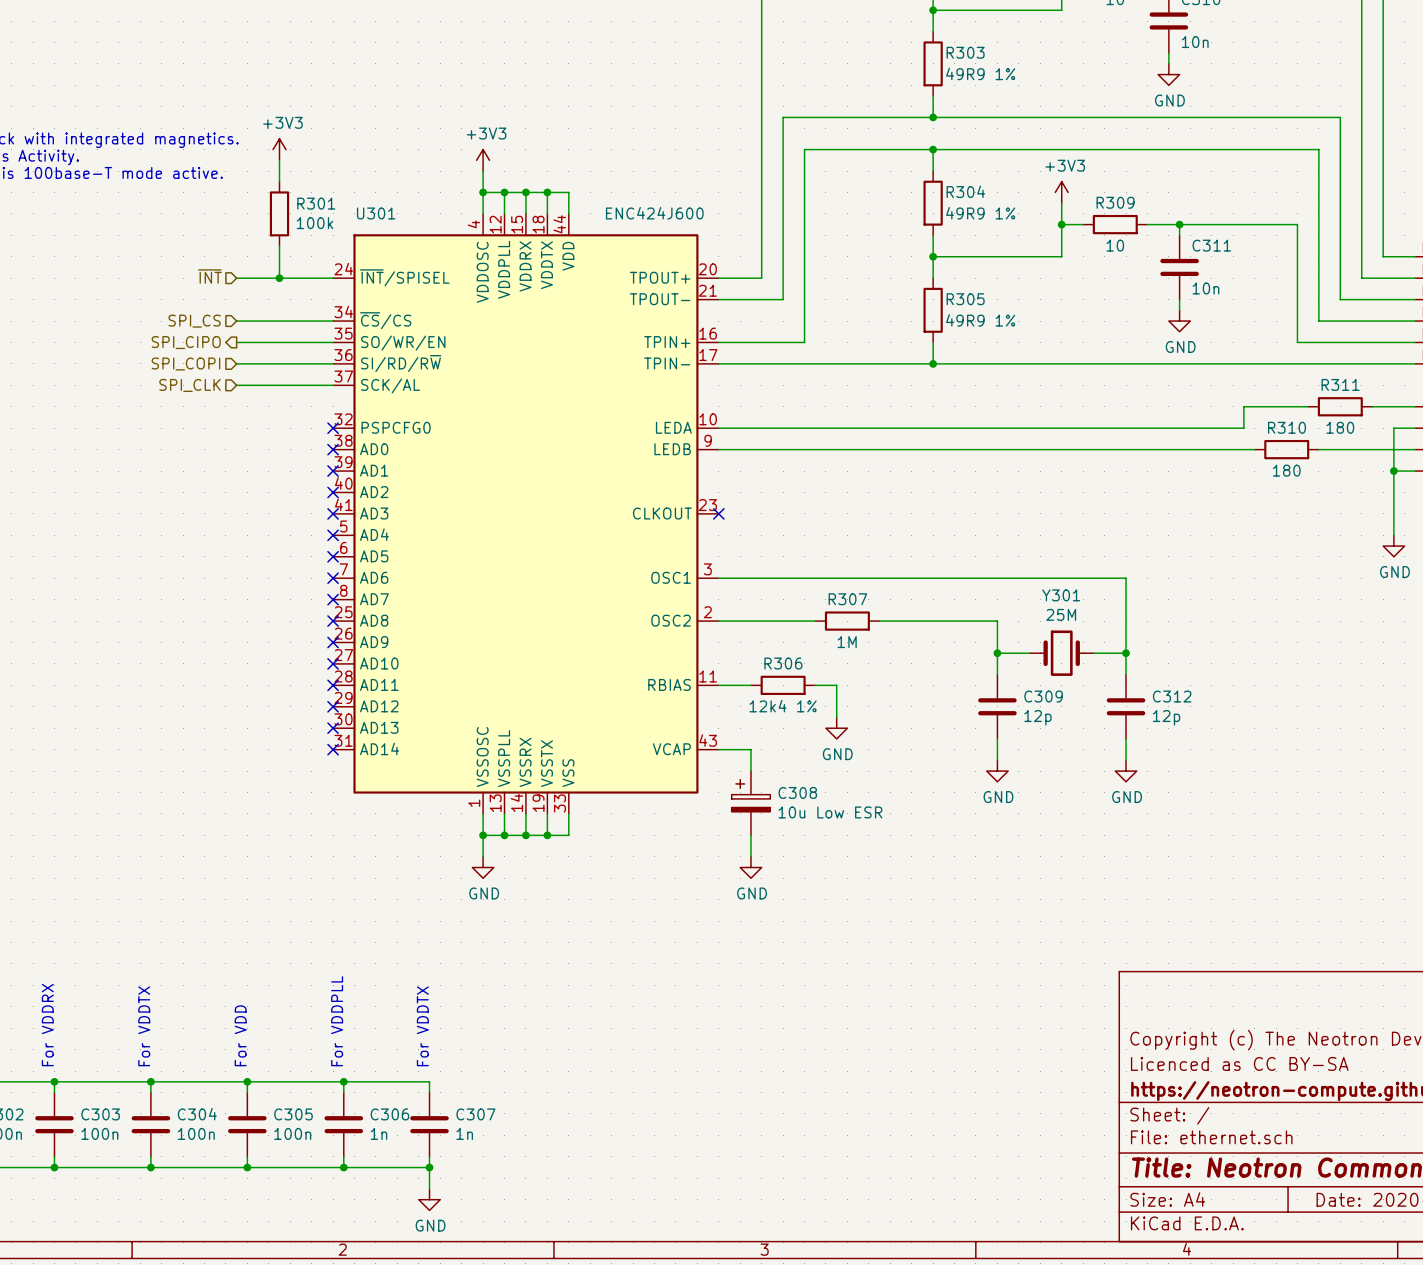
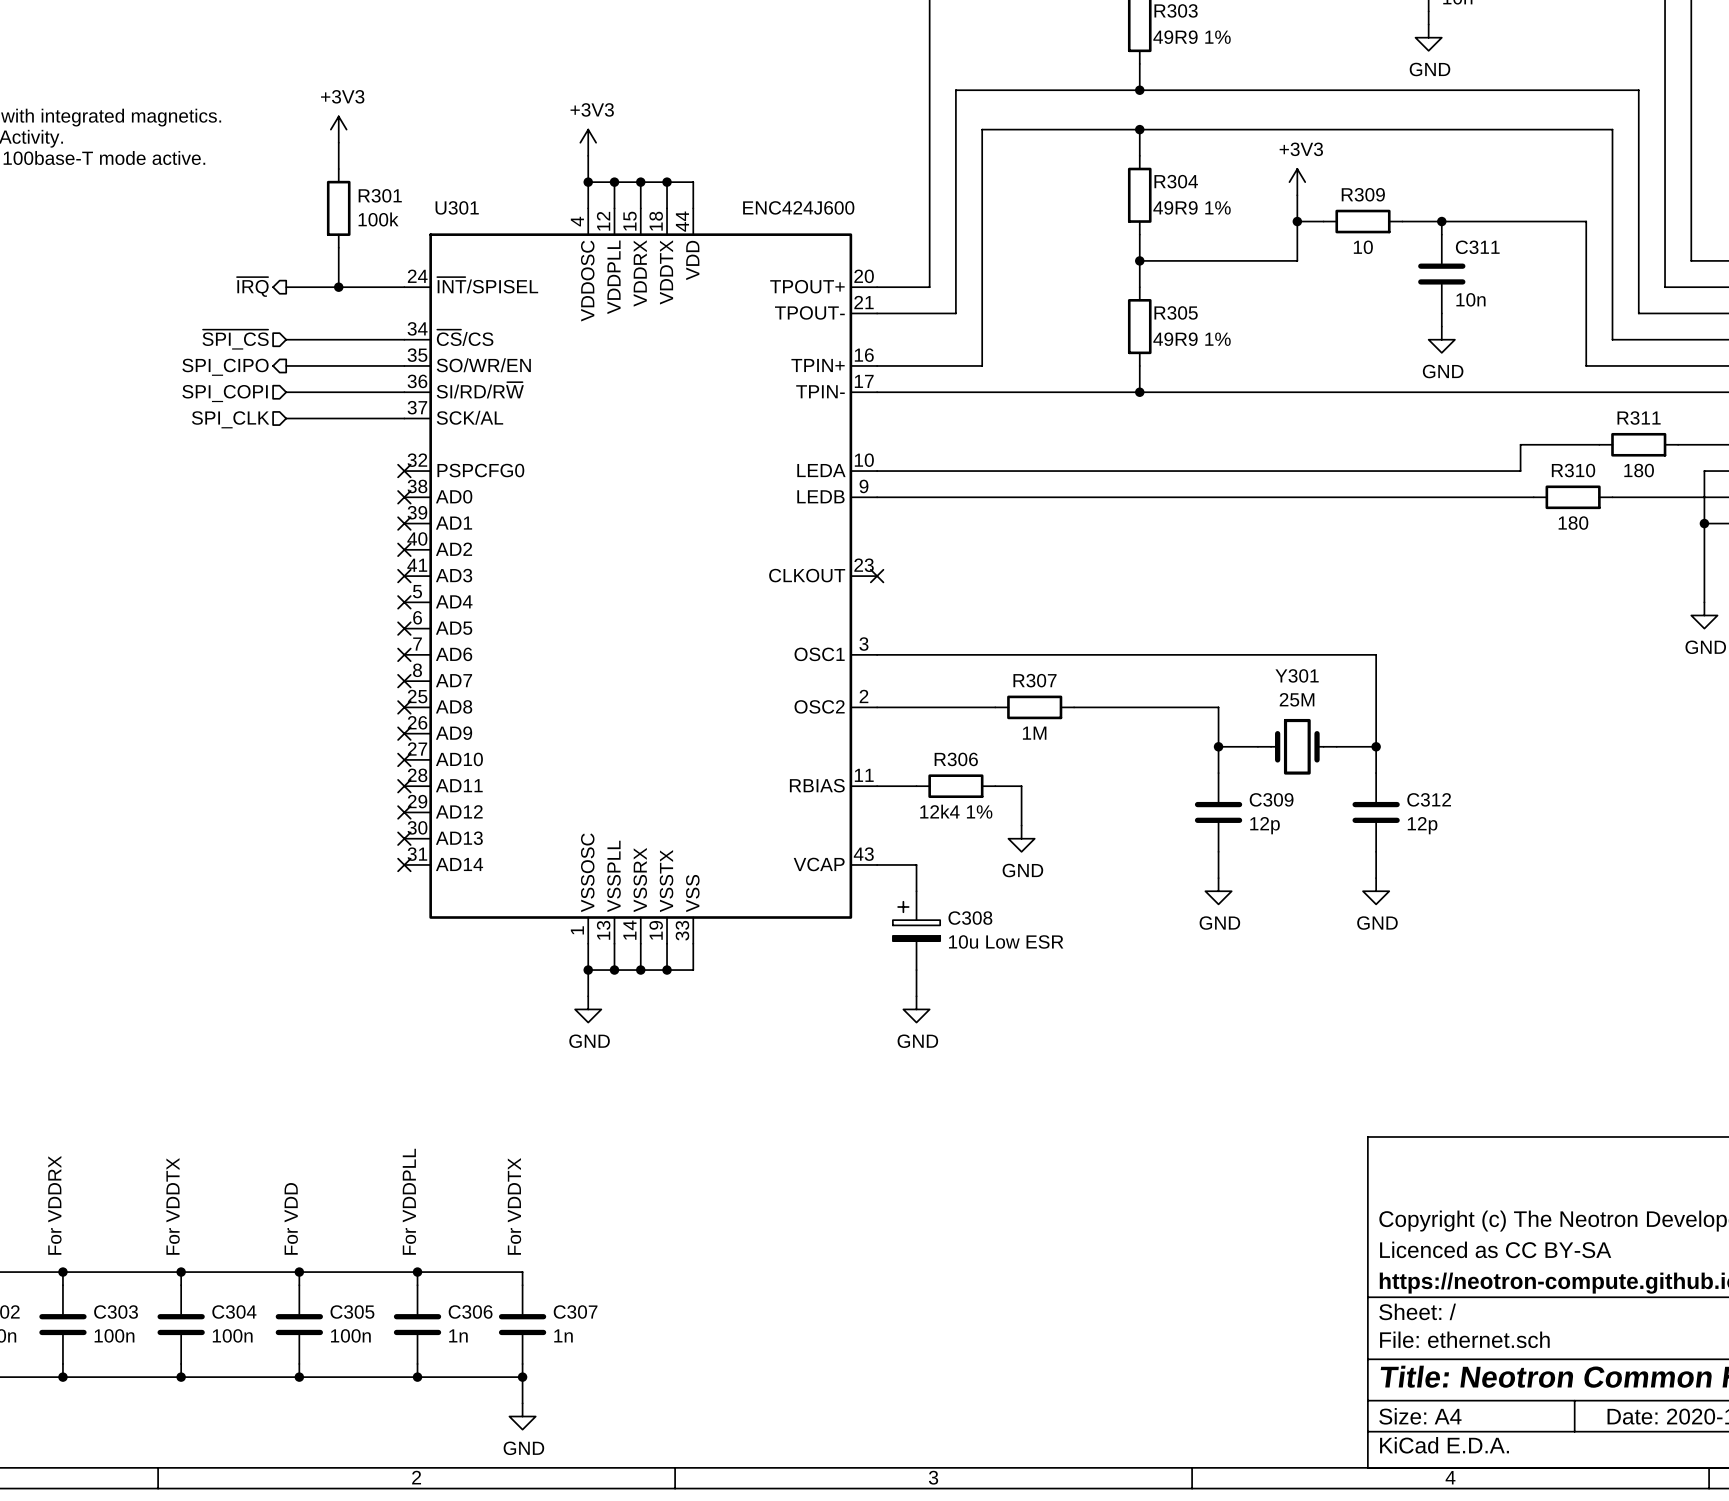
hierarchical label shape: input (209, 276) -> output (252, 286)
hierarchical label: ~{INT} (209, 276) -> ~{IRQ} (252, 286)
hierarchical label: SPI_CS (194, 321) -> ~{SPI_CS} (235, 339)

